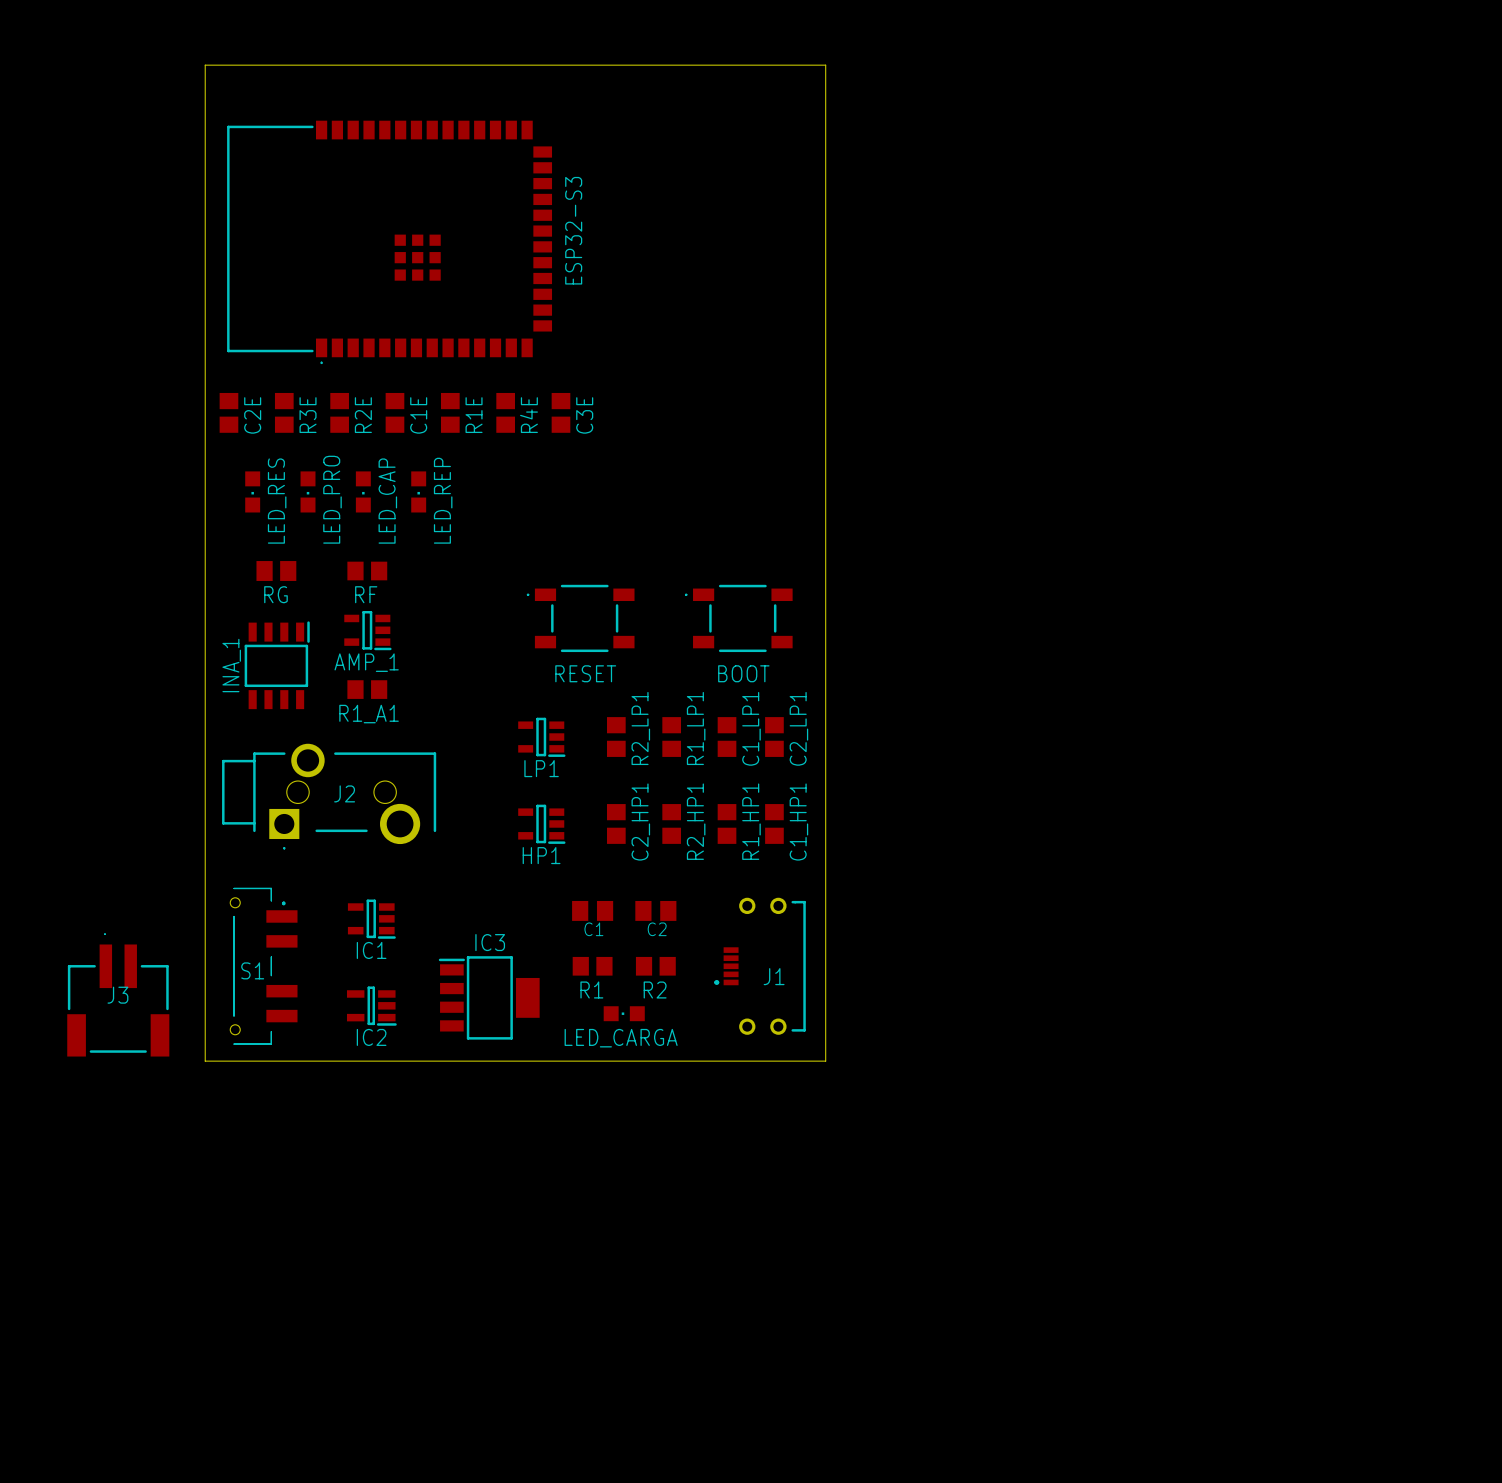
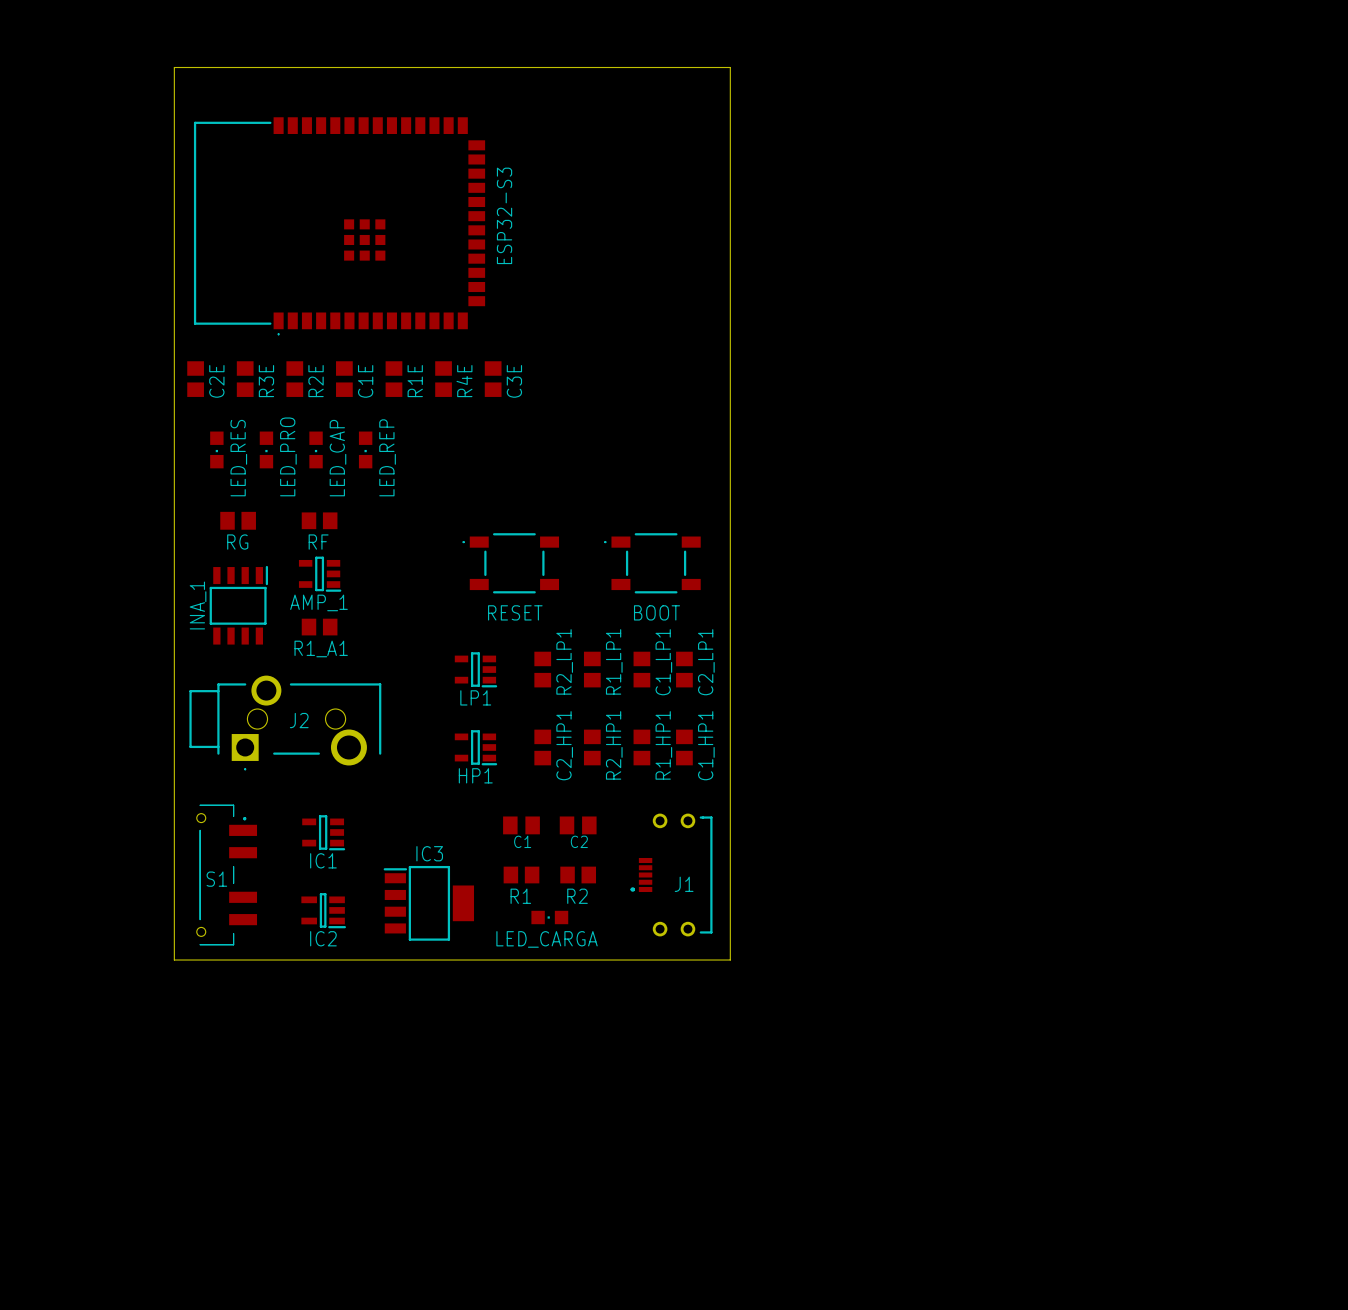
J3: (118, 995) -> none

